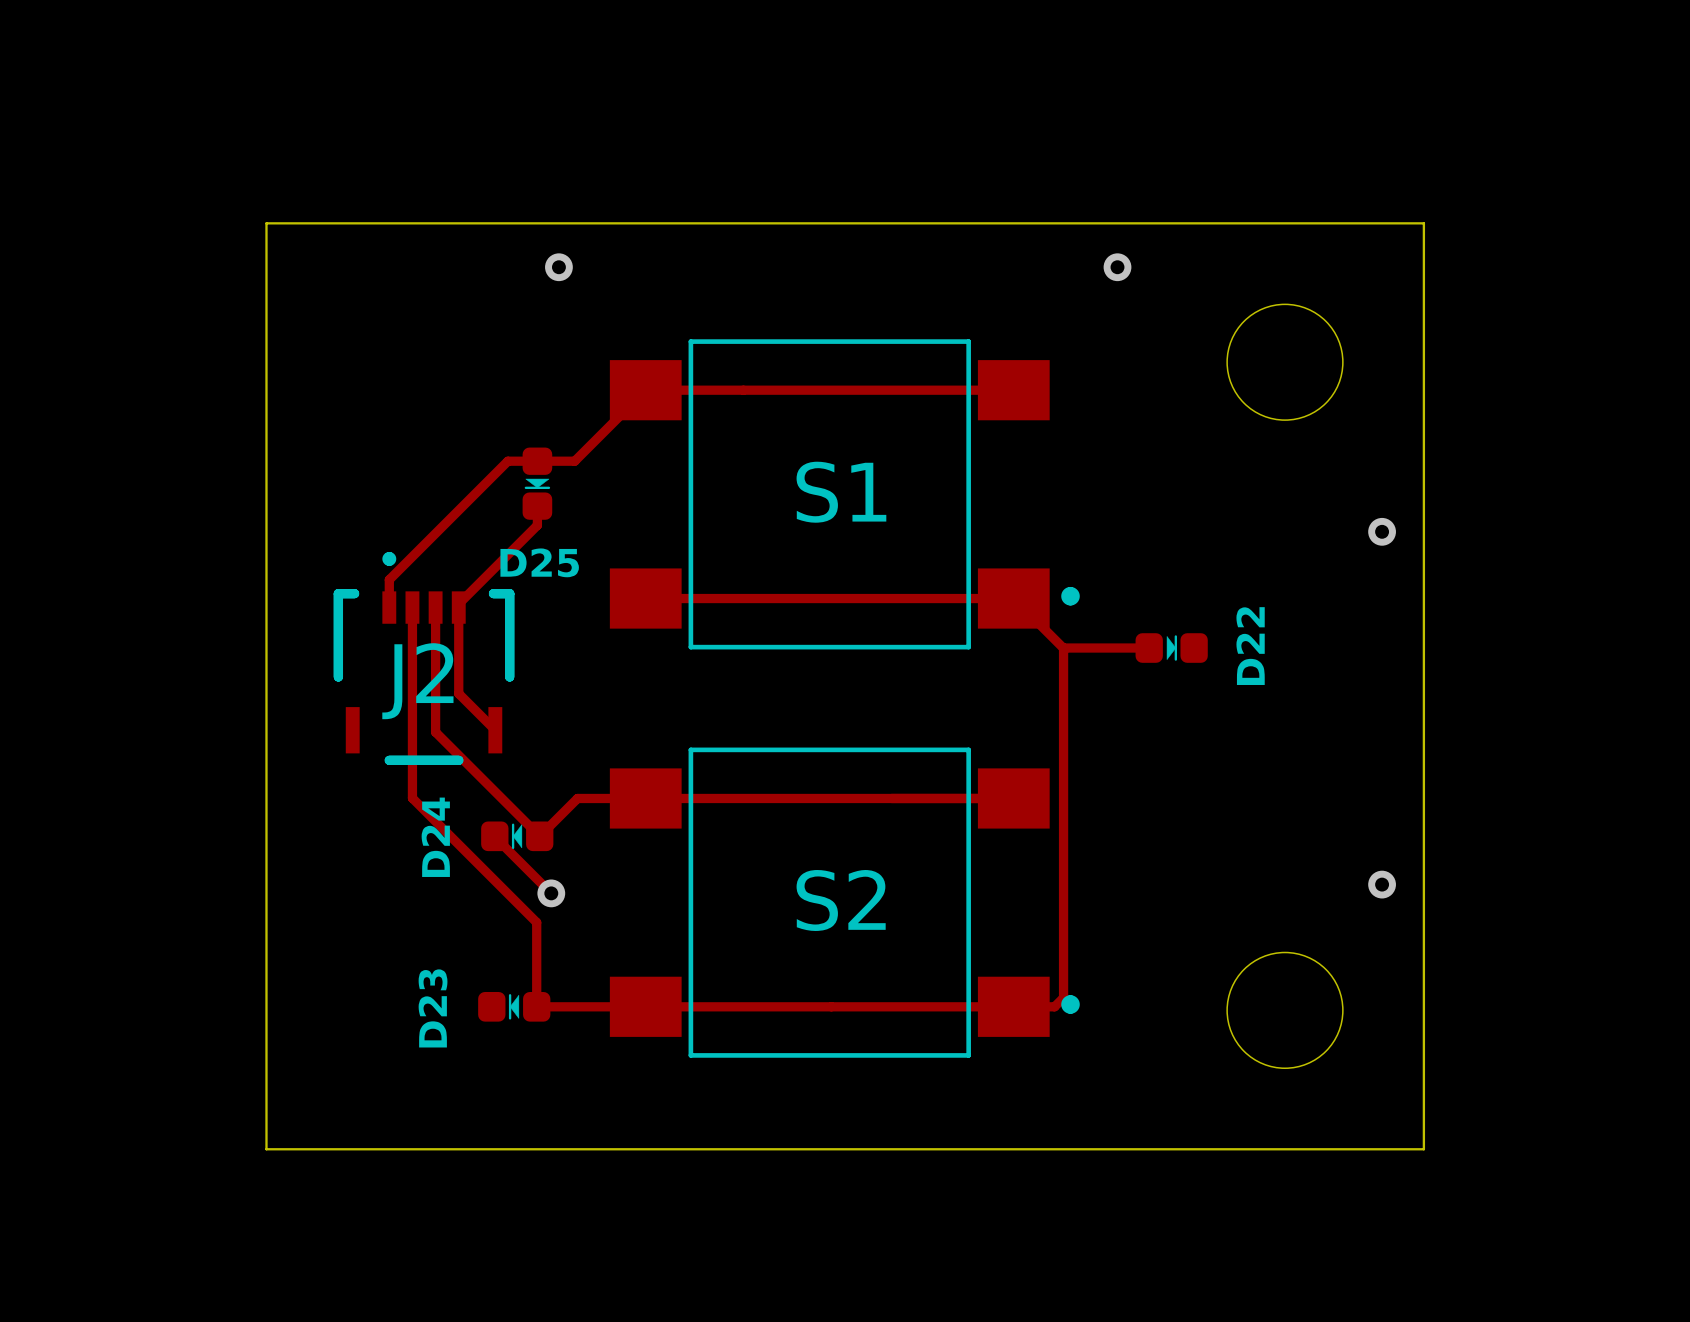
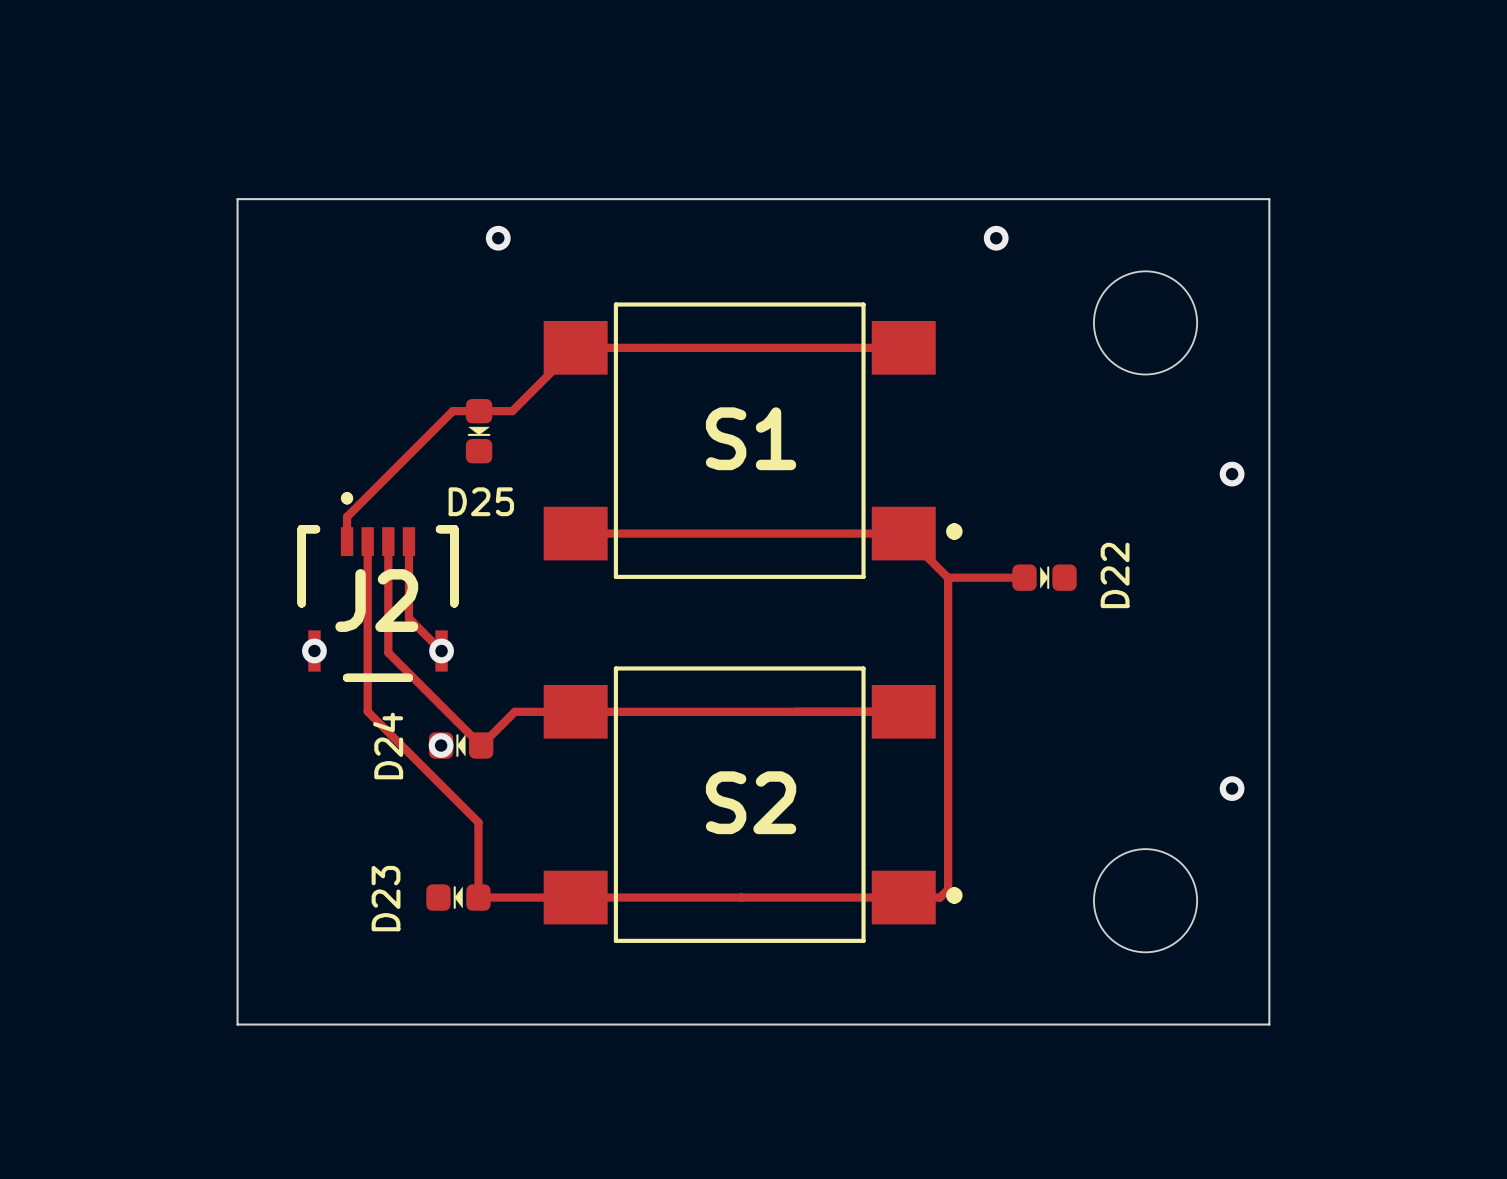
top track: (537, 506) (537, 525) (458, 603) (458, 607) -> none
via: none -> (314, 650)
via: none -> (441, 650)
top track: (494, 836) (551, 893) -> none
via position: (551, 893) -> (441, 745)

